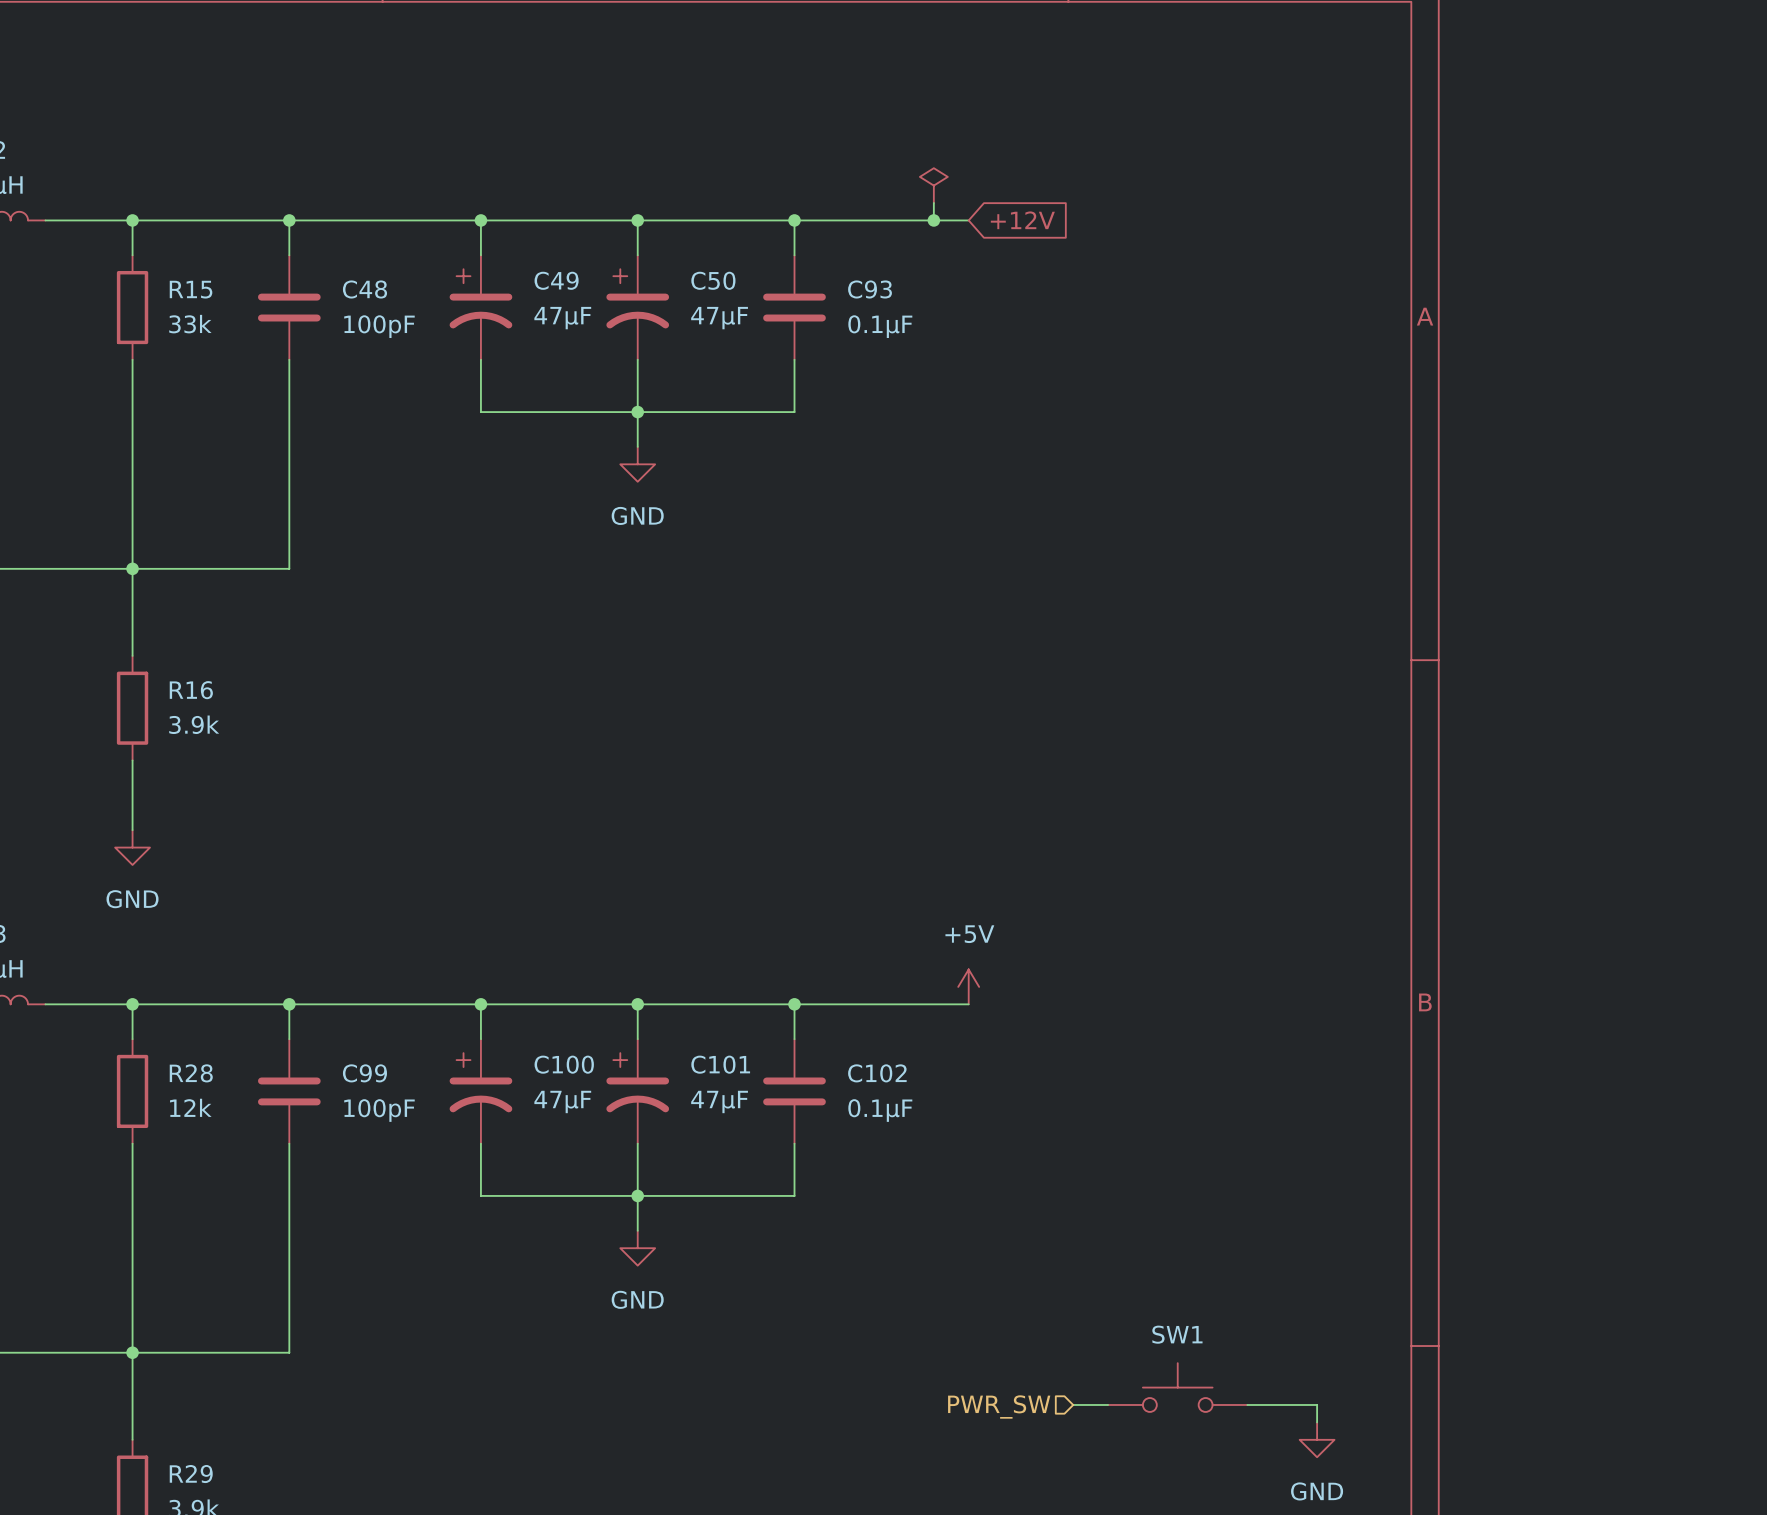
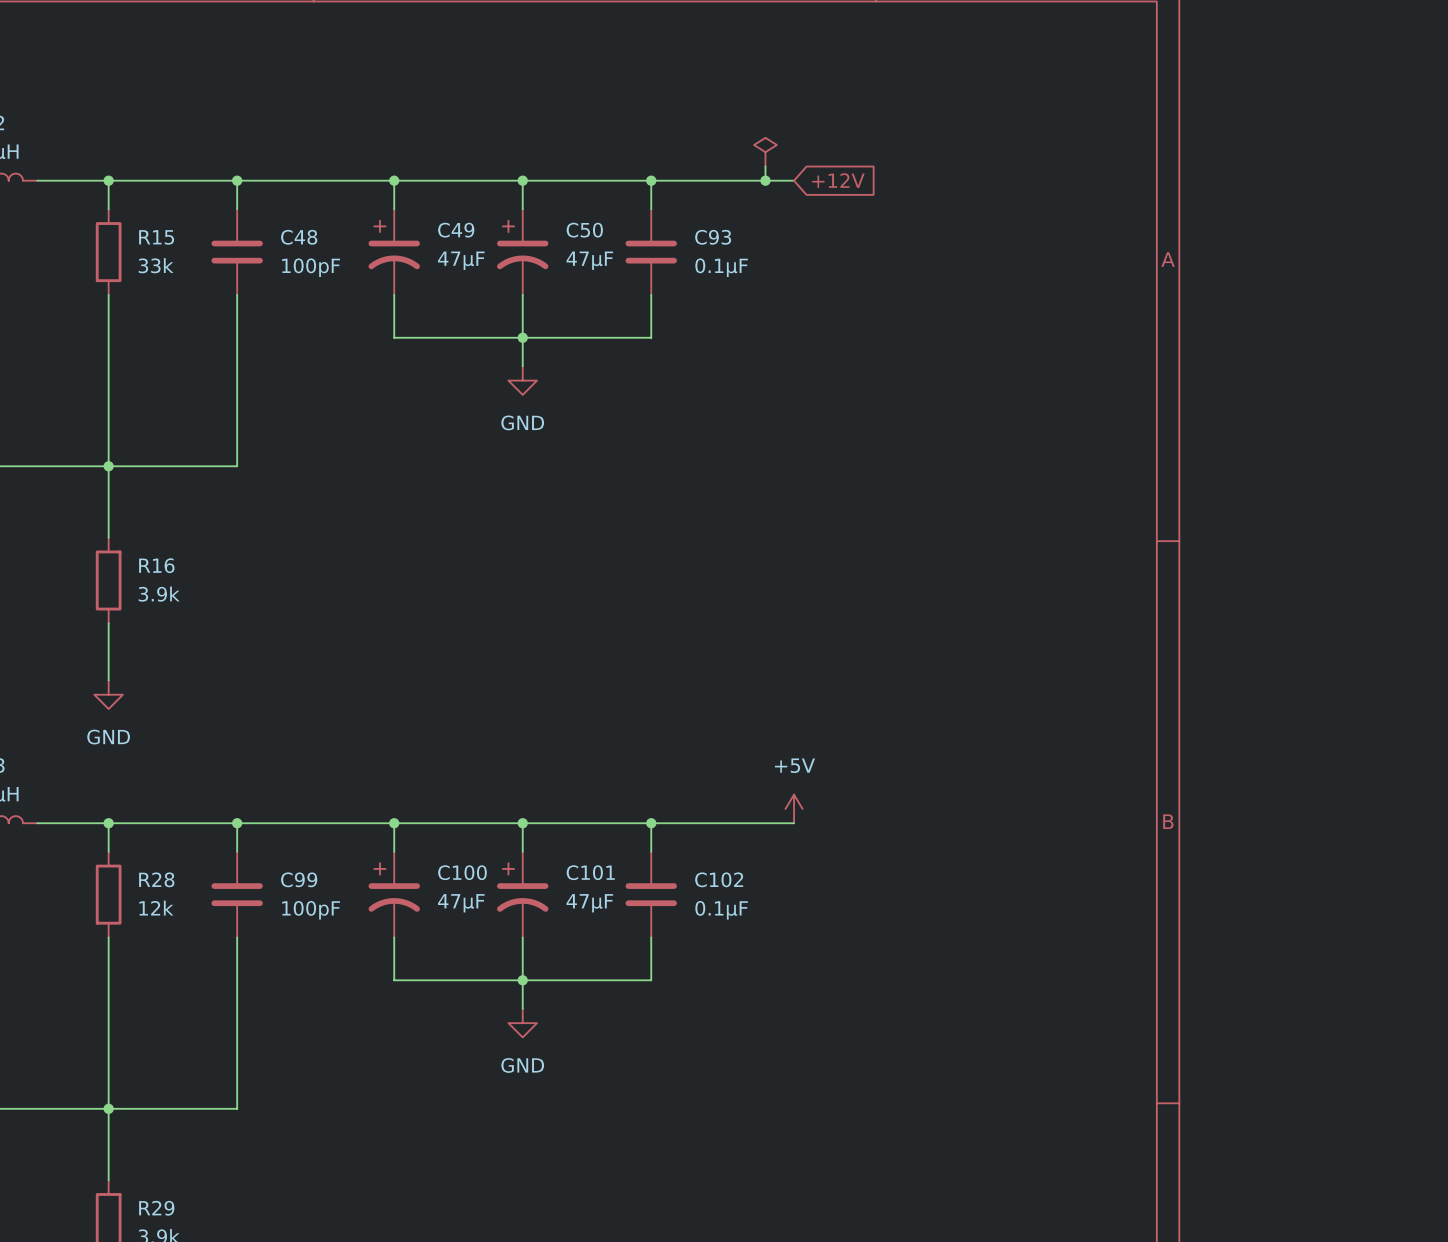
SW1: (1177, 1387) -> none
wire: (1073, 1404) (1108, 1404) -> none
wire: (1247, 1404) (1317, 1404) (1317, 1422) -> none
hierarchical label: PWR_SW (999, 1407) -> none
power symbol: GND (1317, 1439) -> none

